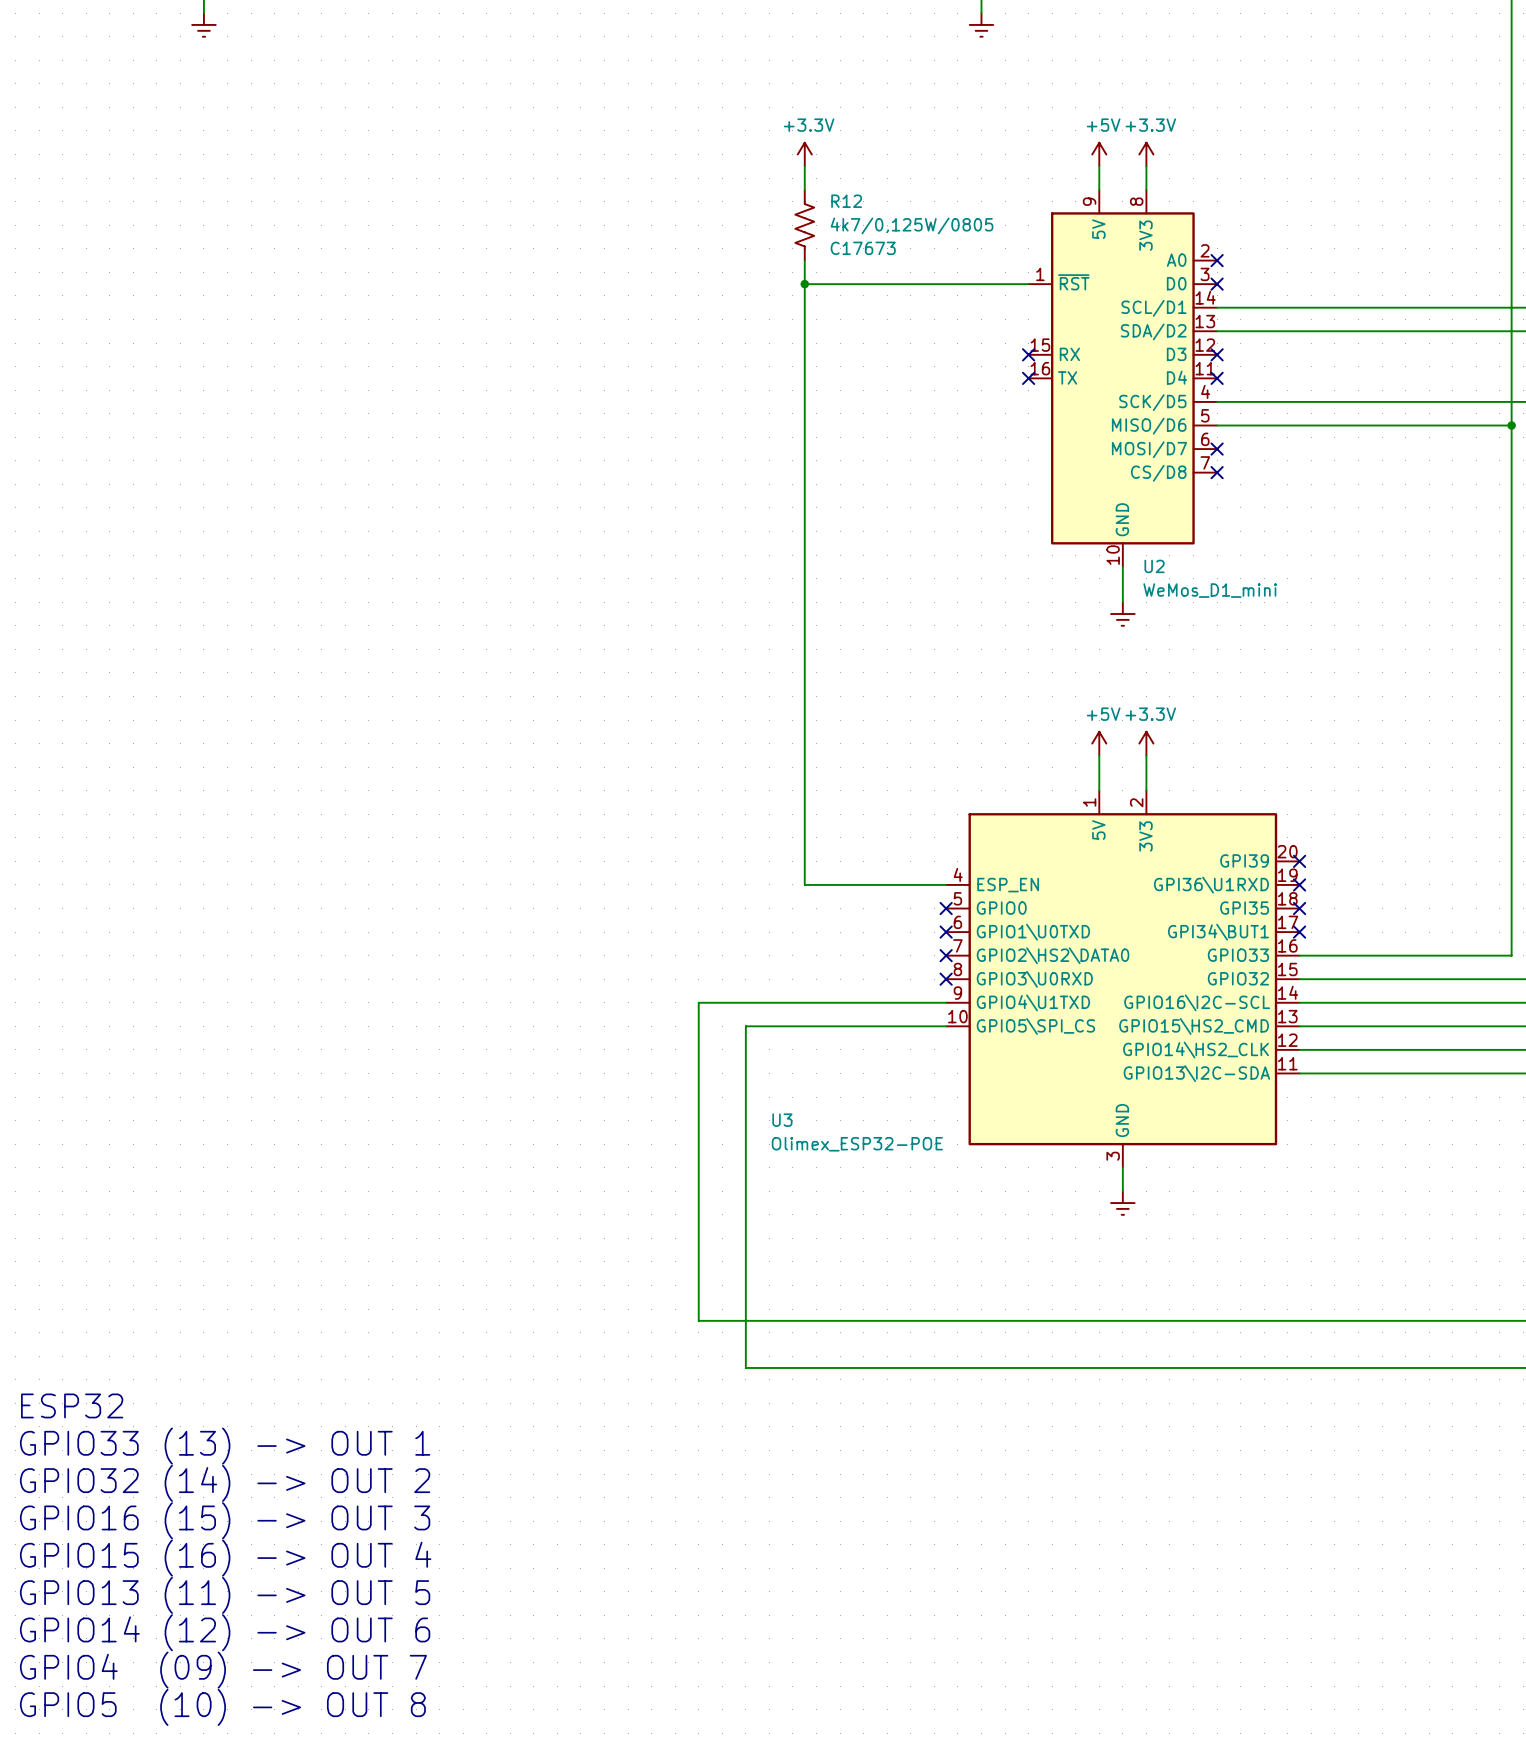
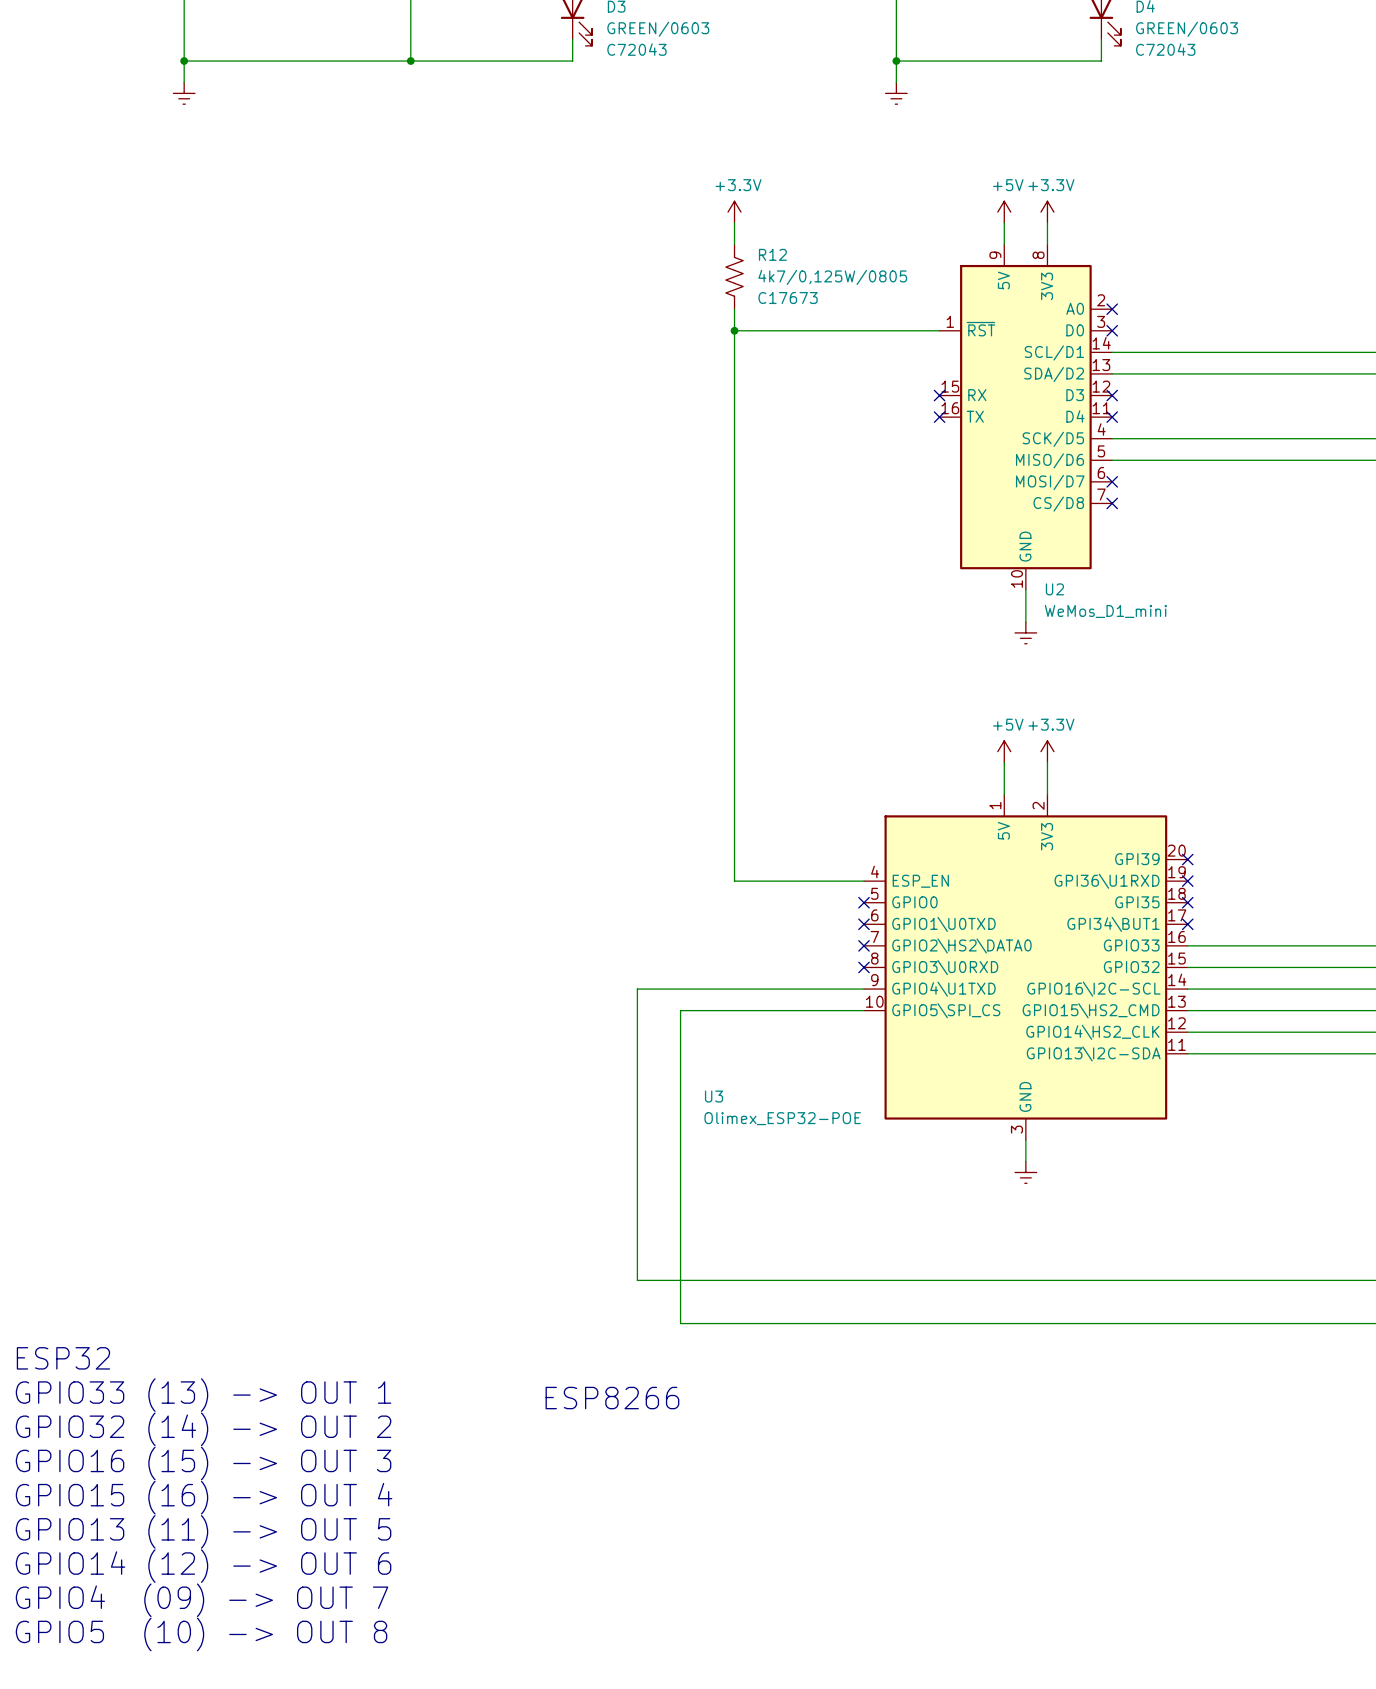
text: none -> ESP8266 (612, 1398)

